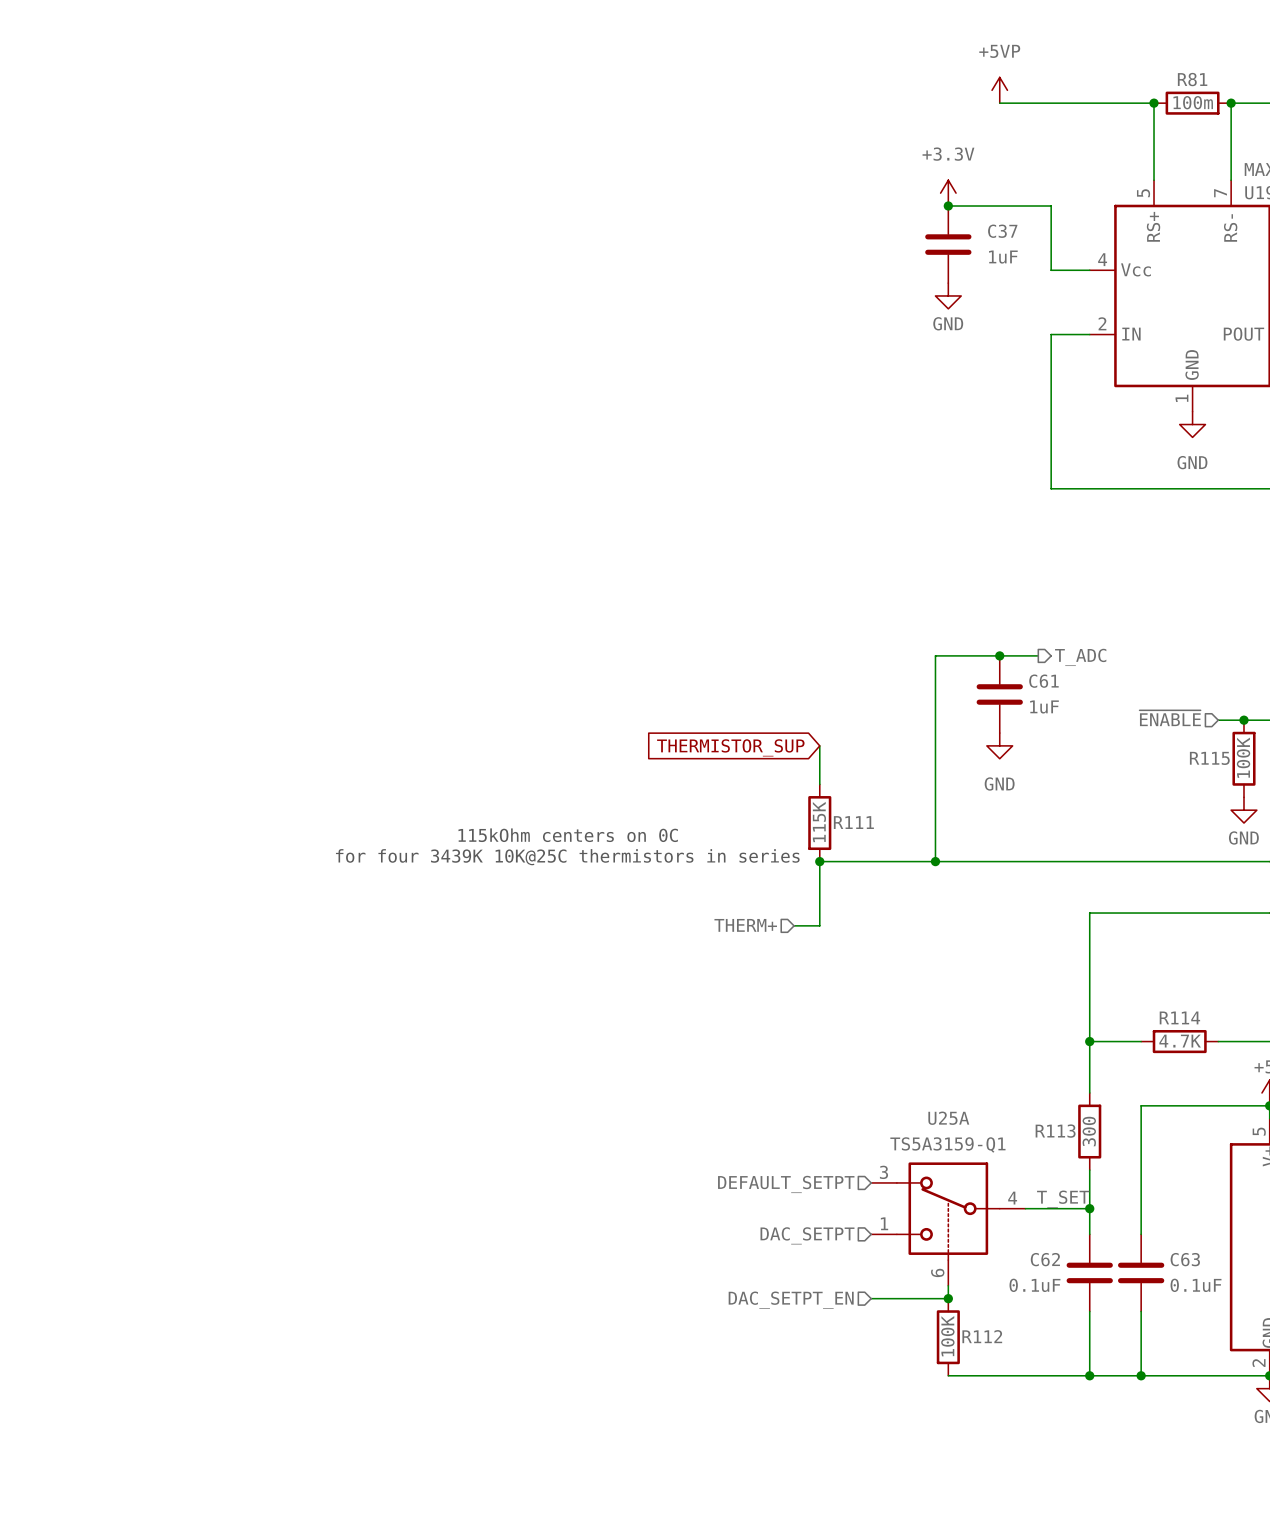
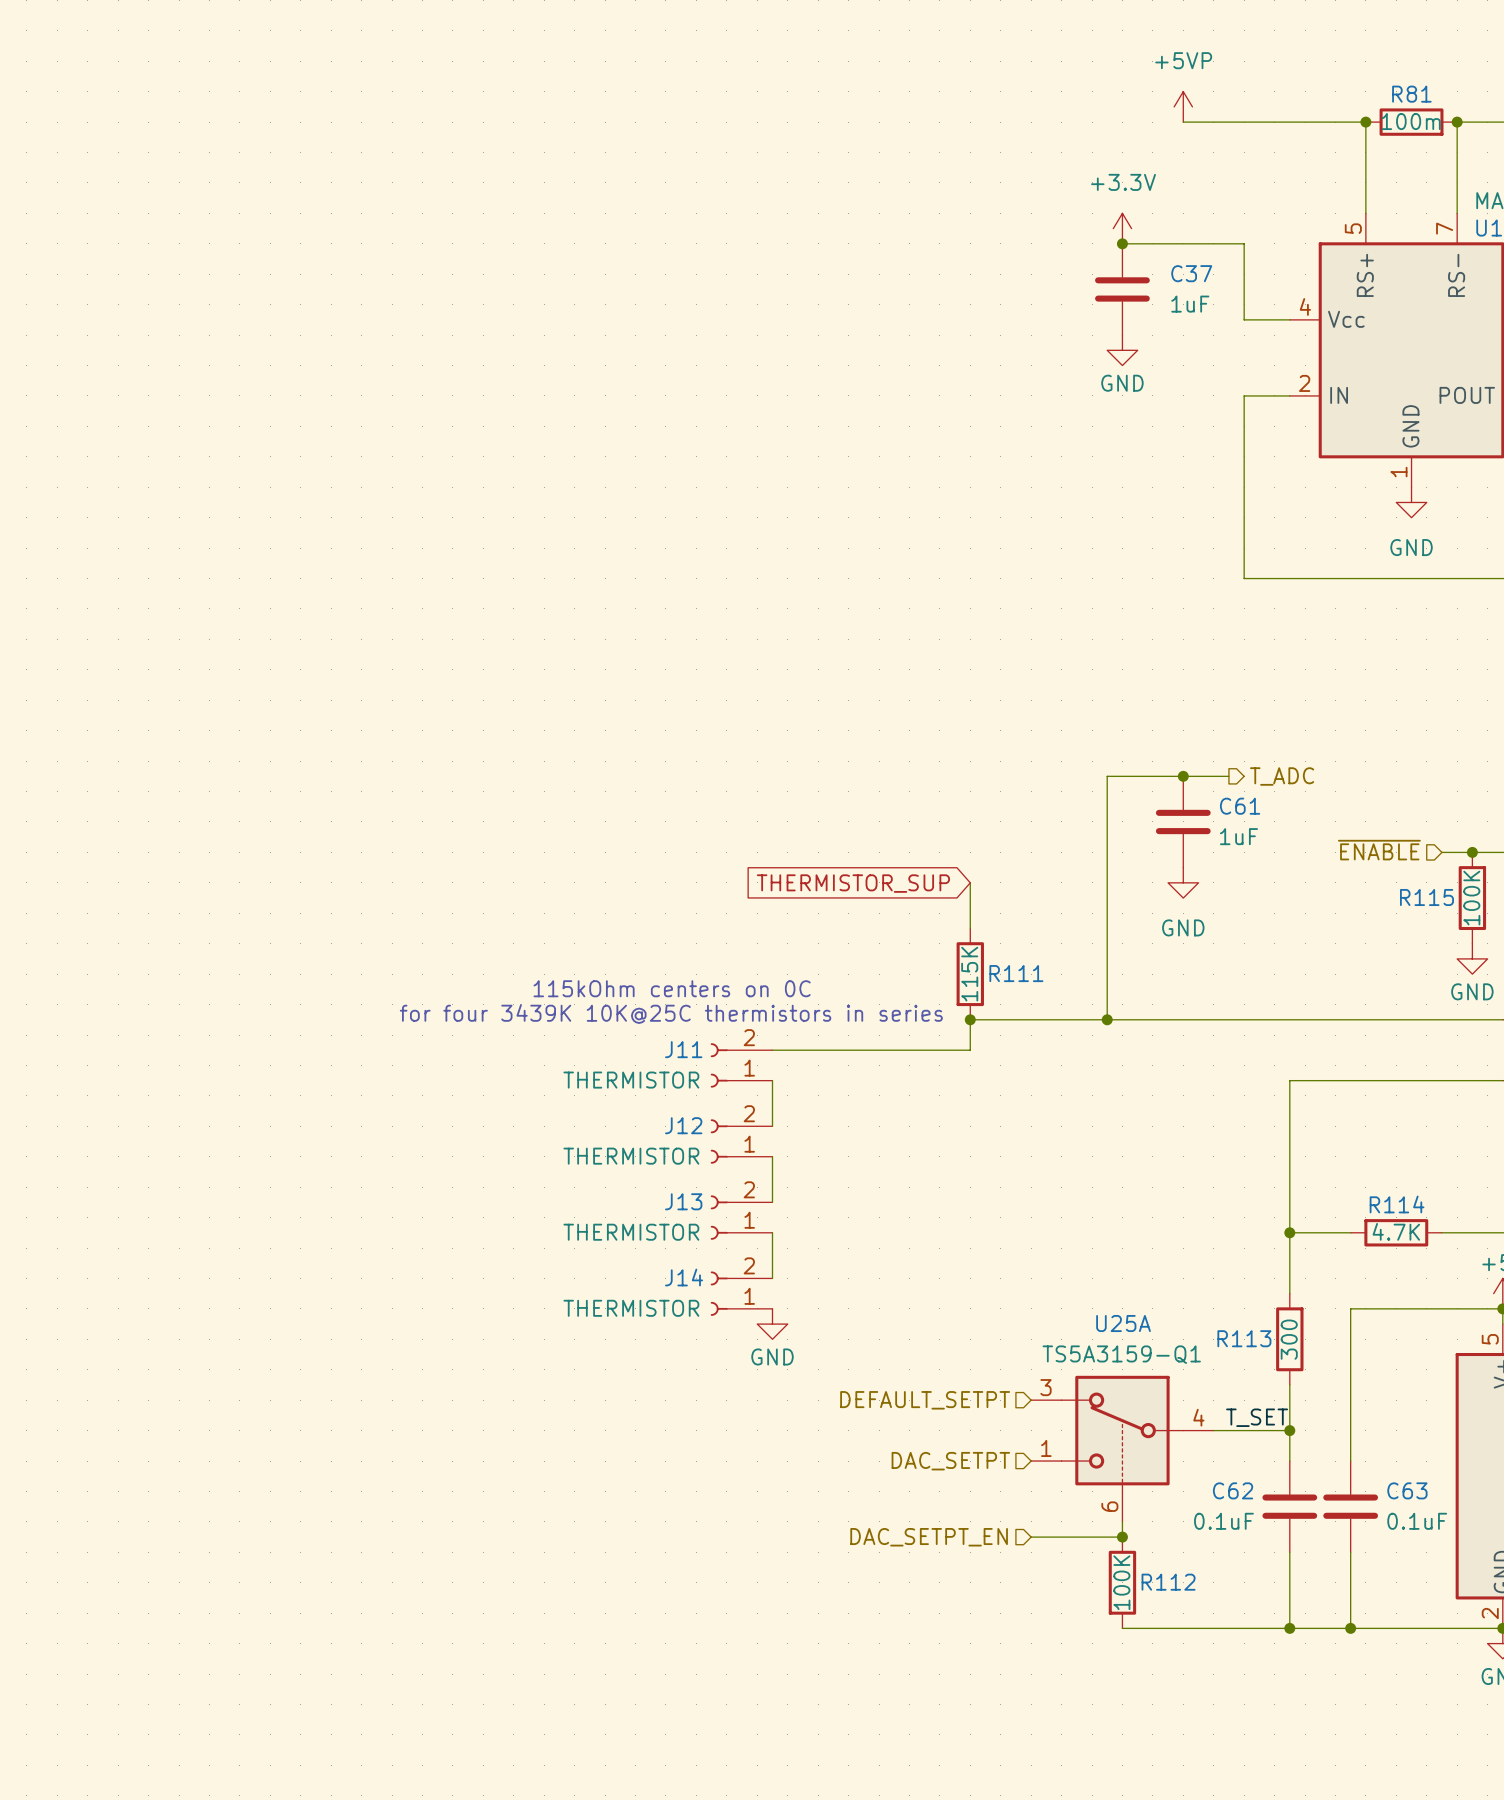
wire: (819, 887) (819, 925) (794, 925) -> (970, 1050) (772, 1050)
J11: none -> THERMISTOR (741, 1065)
wire: none -> (772, 1080) (772, 1126)
hierarchical label: THERM+ (745, 925) -> none
J12: none -> THERMISTOR (741, 1141)
wire: none -> (772, 1156) (772, 1202)
J13: none -> THERMISTOR (741, 1217)
wire: none -> (772, 1232) (772, 1278)
J14: none -> THERMISTOR (741, 1293)
power symbol: none -> GND (772, 1324)

